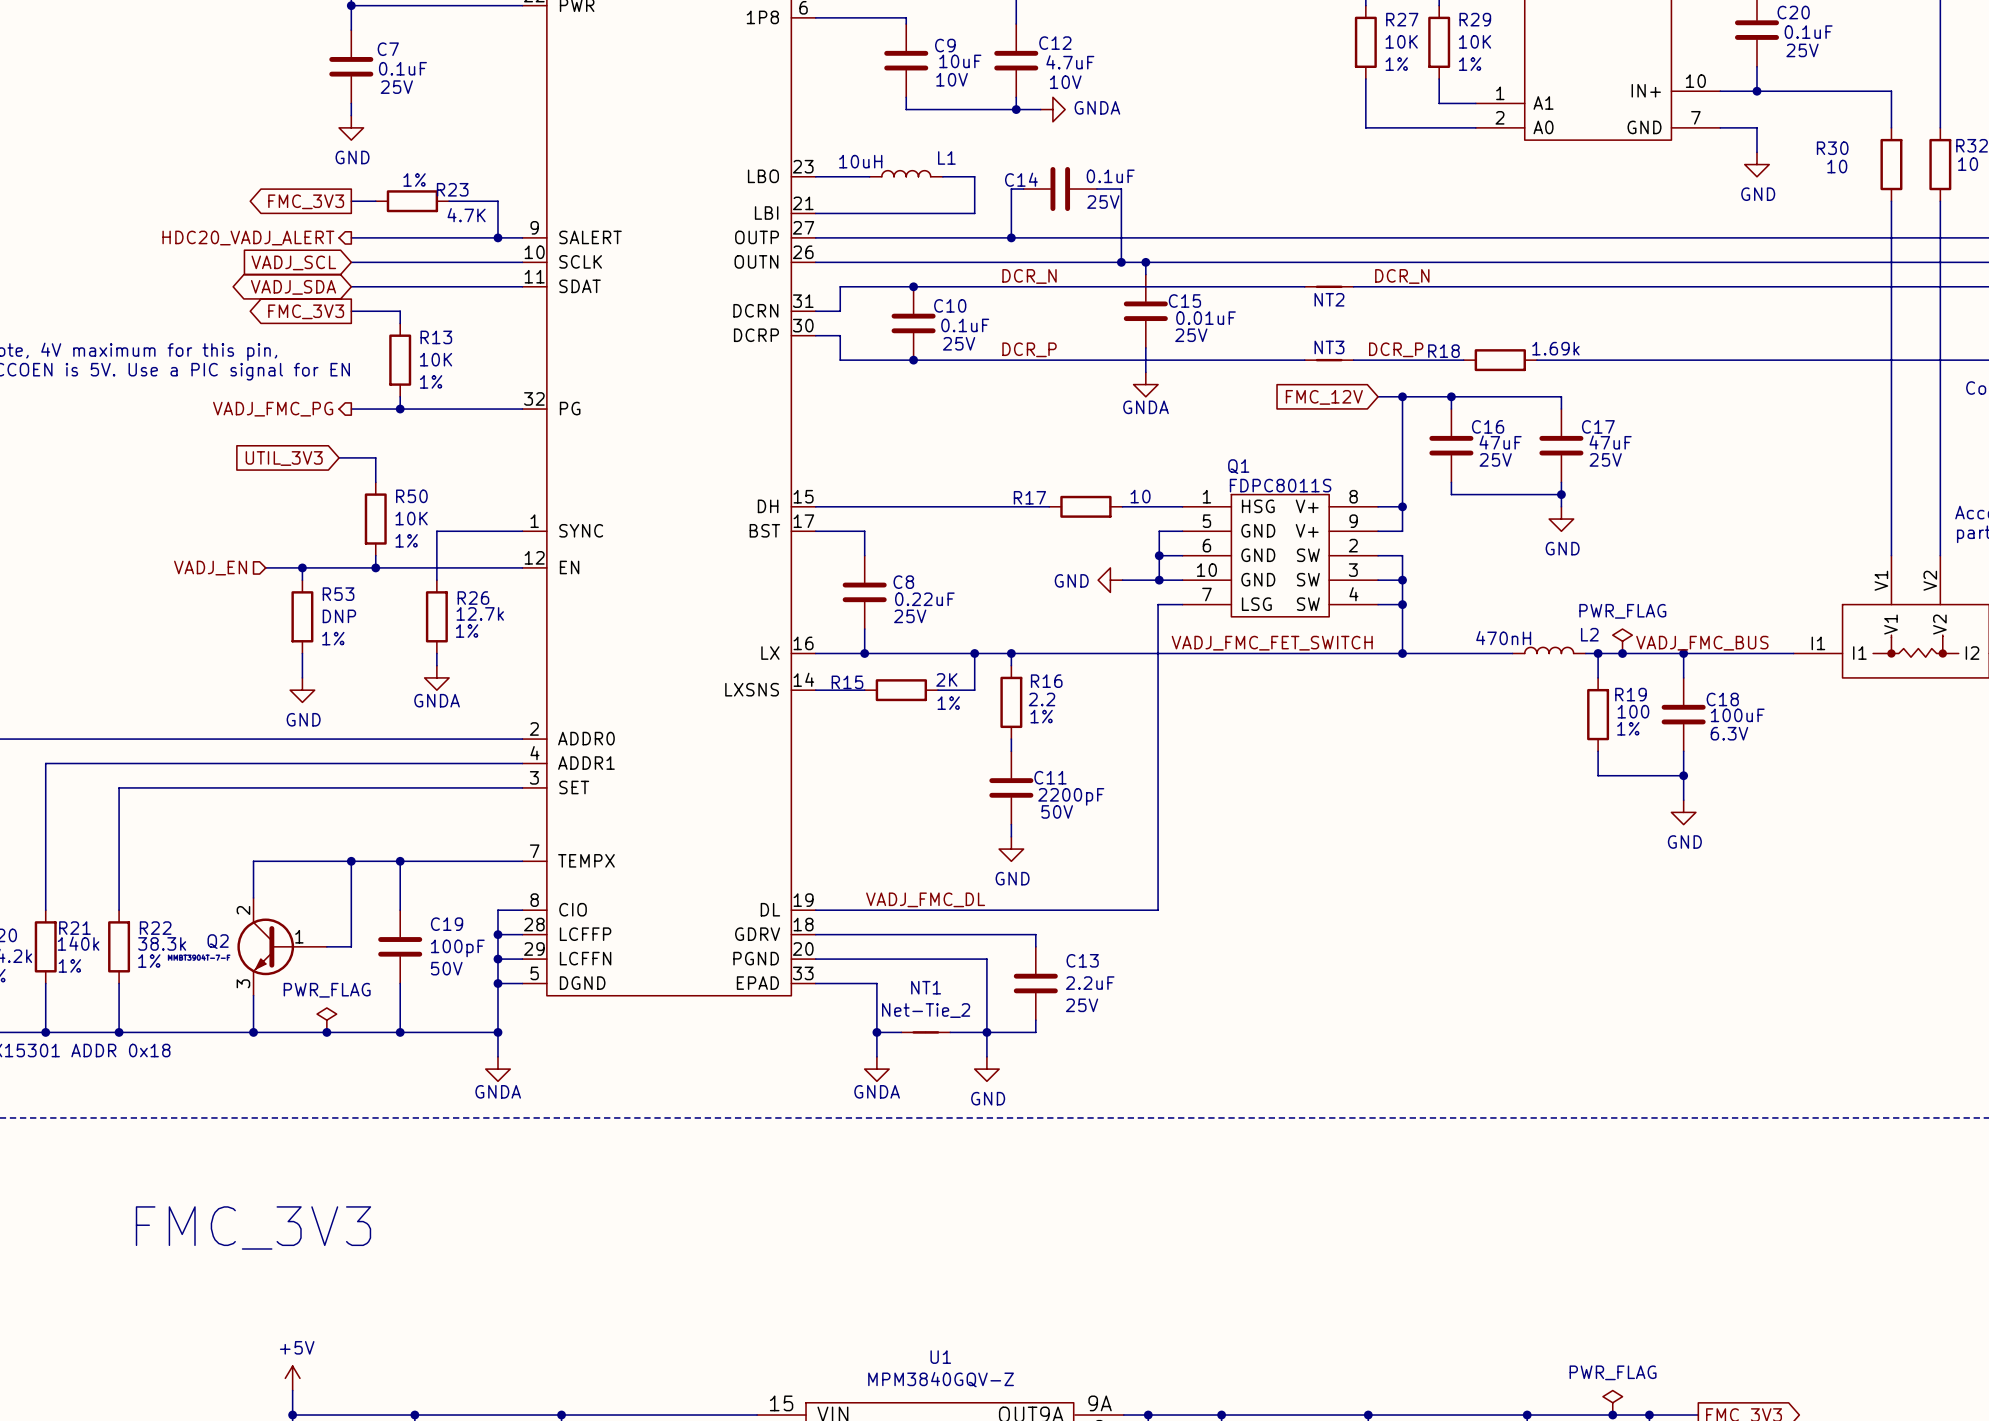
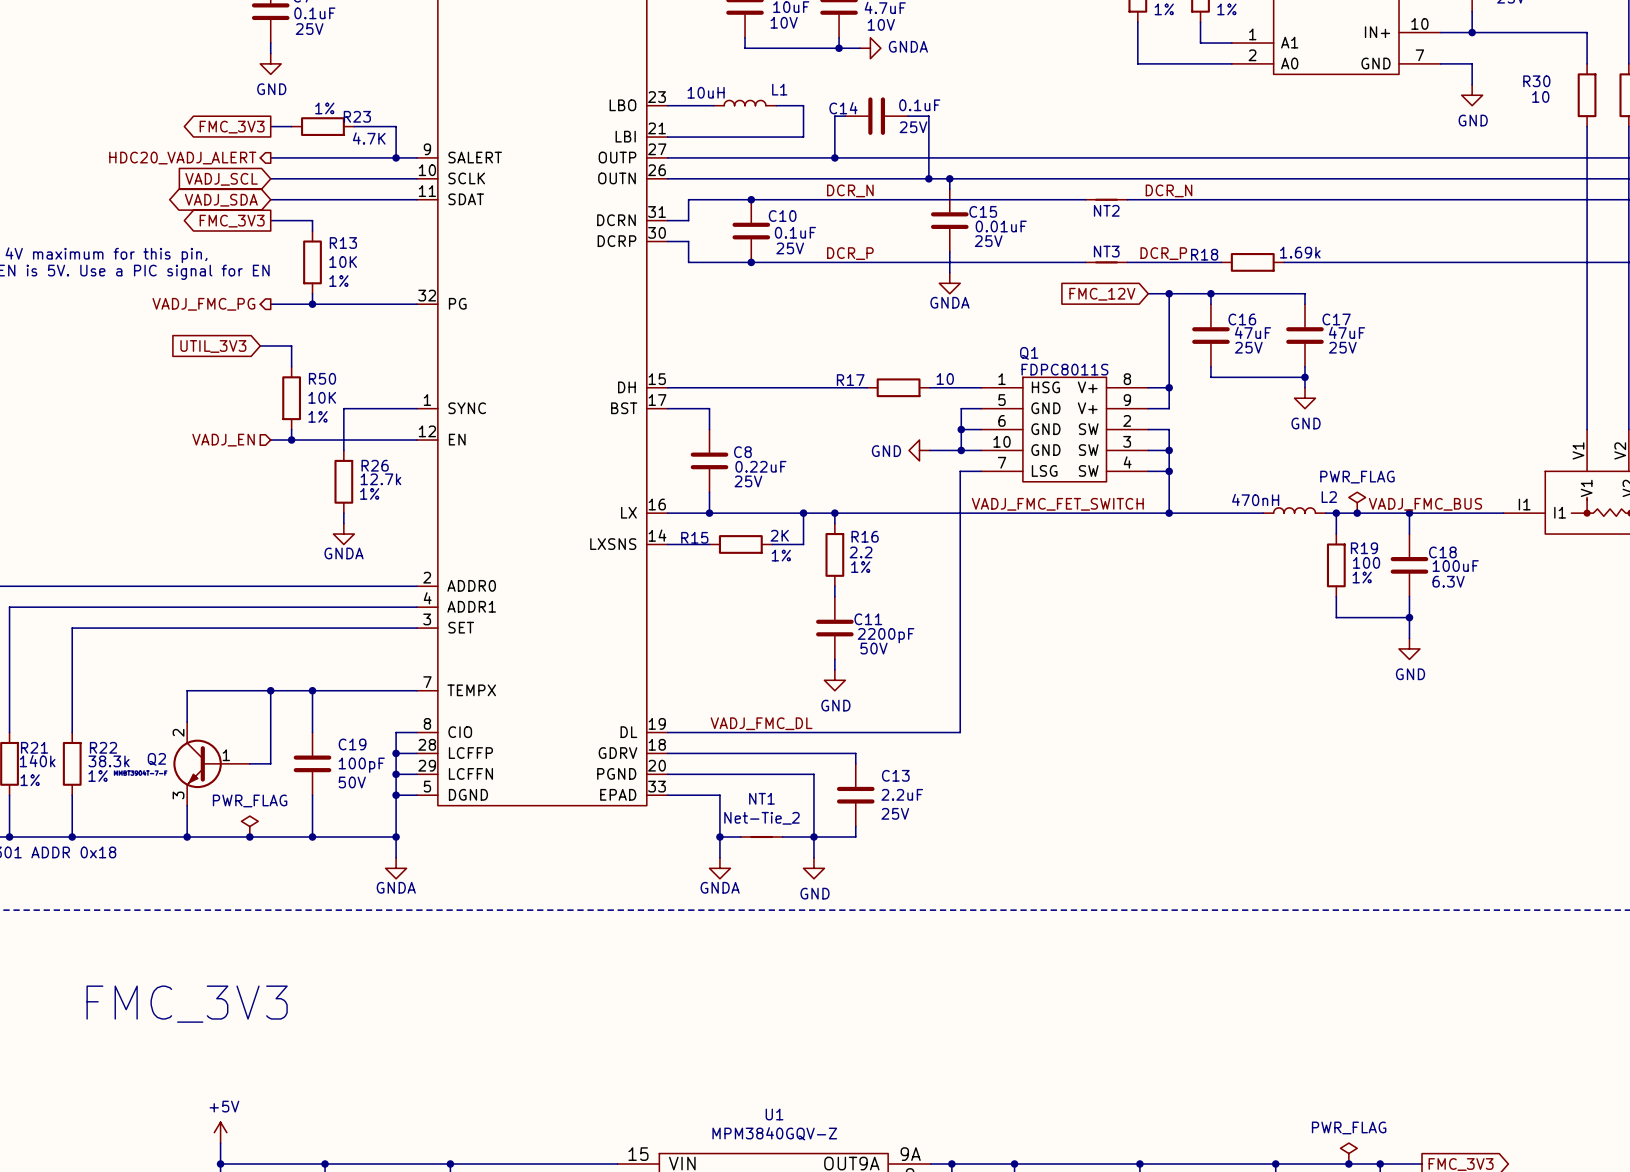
wire: (265, 567) (351, 567) -> none
wire: (302, 567) (302, 580) -> none
junction: (302, 567) -> none
hierarchical label position: VADJ_EN (210, 568) -> VADJ_EN (223, 440)
R53: DNP (302, 616) -> none
wire: (302, 653) (302, 677) -> none
power symbol: GND (302, 690) -> none

